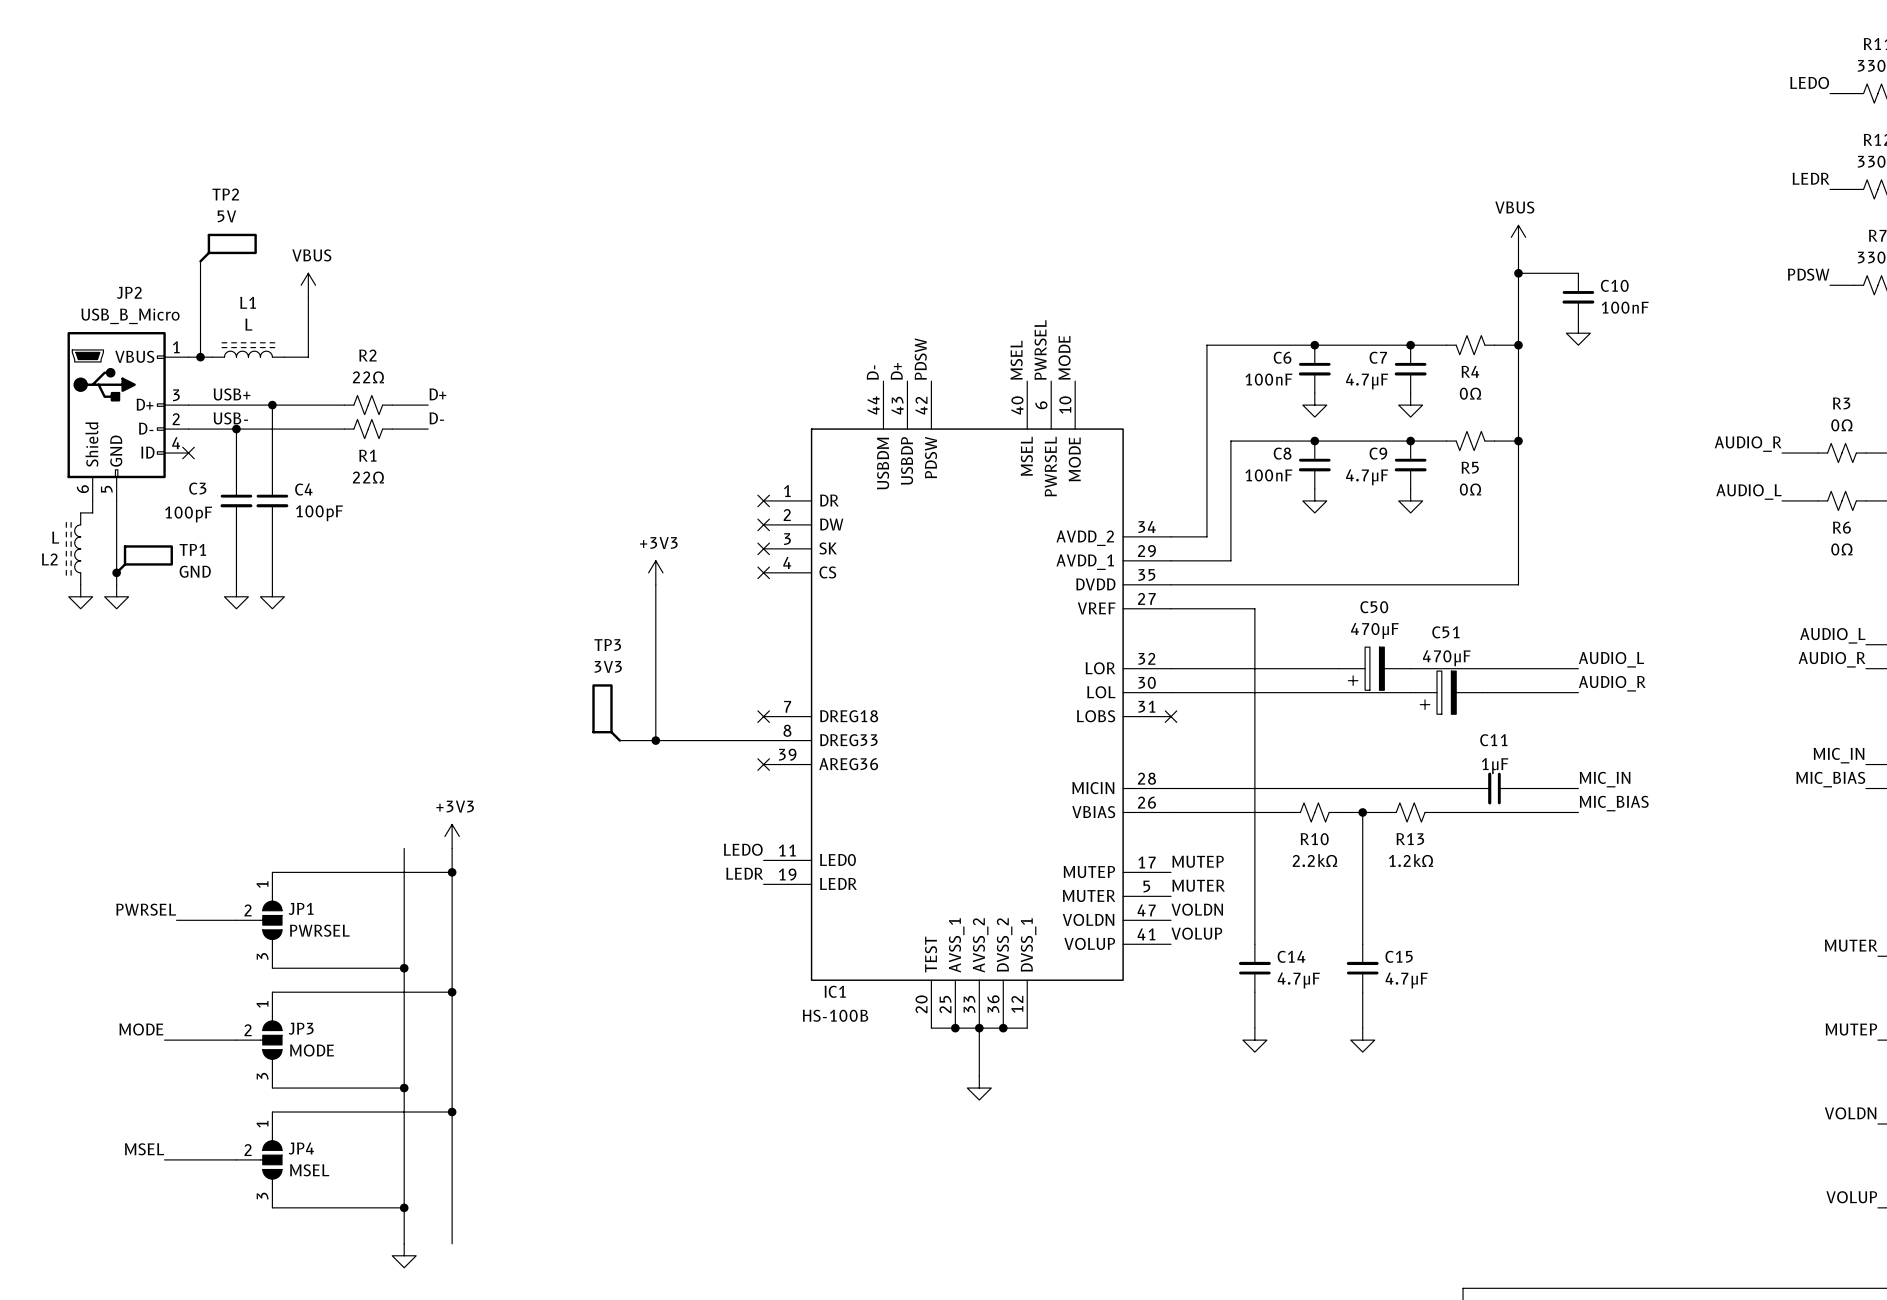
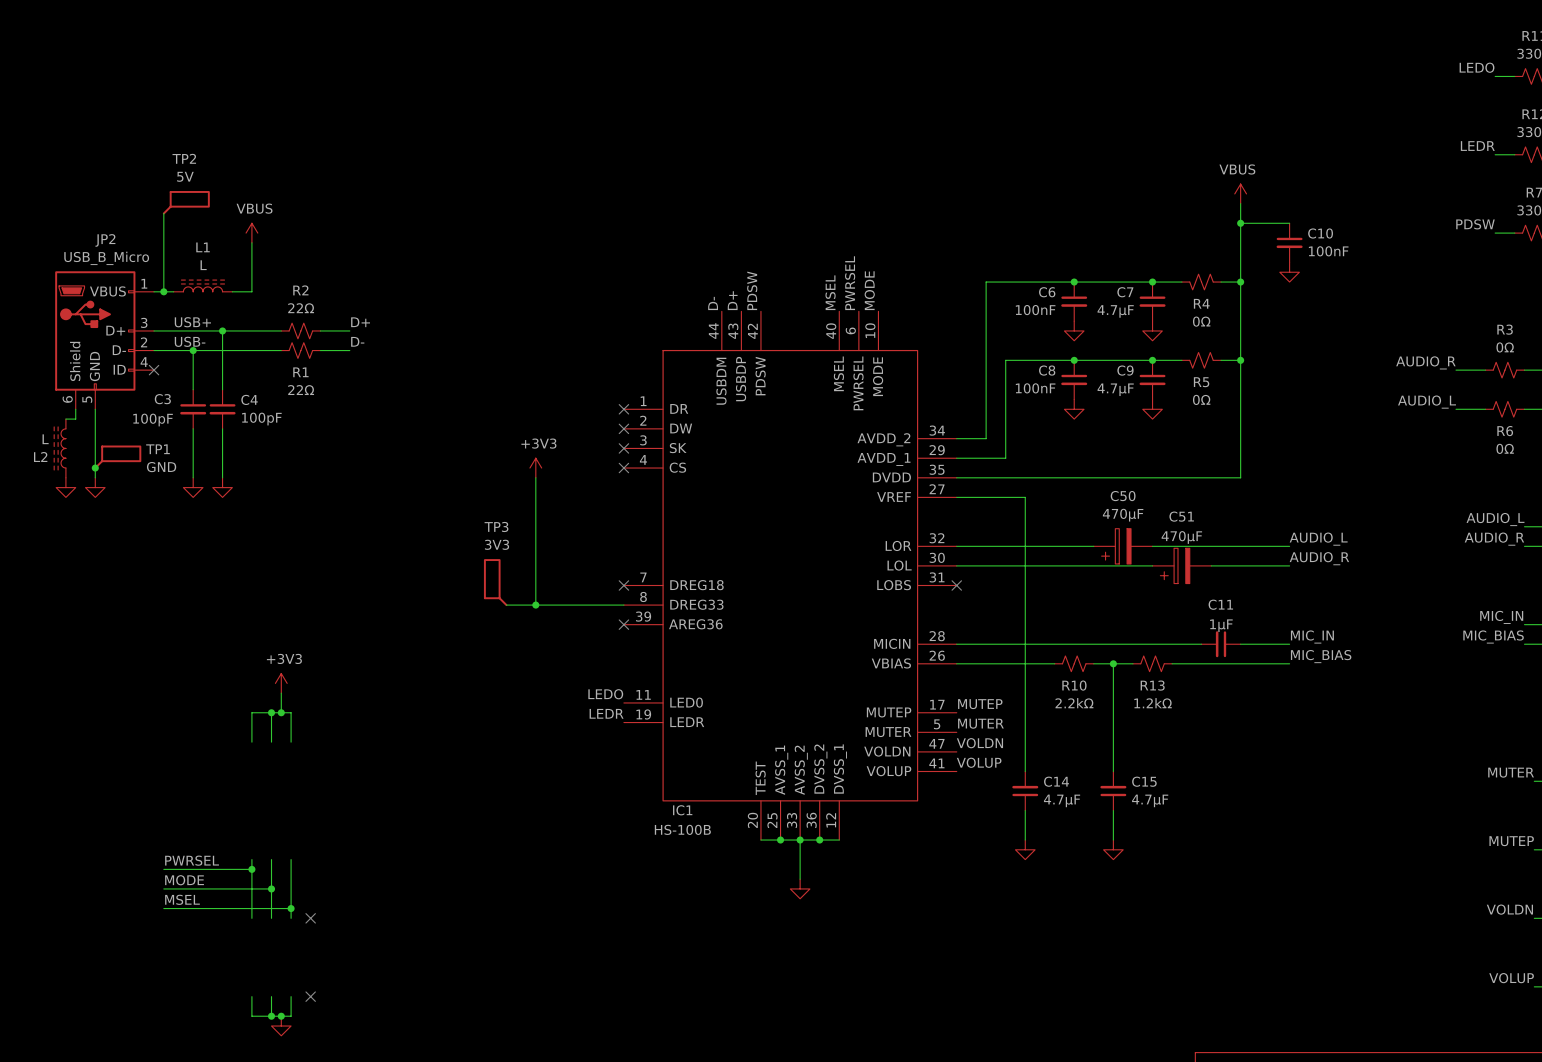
power symbol position: +3V3 (452, 836) -> +3V3 (281, 683)
wire: none -> (281, 693) (281, 712)
wire: (404, 848) (404, 1243) -> none
wire: (452, 848) (452, 1243) -> none
wire: (272, 872) (308, 872) -> (251, 742) (251, 712)
wire: none -> (271, 712) (271, 742)
junction: none -> (271, 712)
junction: none -> (281, 712)
wire: (356, 872) (452, 872) -> (291, 712) (291, 742)
junction: (452, 872) -> none
label position: PWRSEL (146, 909) -> PWRSEL (192, 860)
wire: (176, 920) (236, 920) -> none
JP1: PWRSEL (259, 920) -> none
wire: (272, 968) (404, 968) -> none
junction: (404, 968) -> none
wire: (272, 992) (452, 992) -> none
junction: (452, 992) -> none
label position: MODE (141, 1029) -> MODE (184, 880)
wire: (164, 1040) (236, 1040) -> (163, 888) (222, 888)
JP3: MODE (259, 1040) -> none
wire: none -> (251, 859) (251, 918)
wire: none -> (271, 859) (271, 918)
wire: none -> (291, 859) (291, 918)
wire: none -> (163, 869) (251, 869)
junction: none -> (251, 869)
wire: (332, 1088) (404, 1088) -> none
junction: none -> (271, 888)
junction: (404, 1088) -> none
wire: (356, 1112) (452, 1112) -> none
junction: none -> (291, 908)
junction: (452, 1112) -> none
no-connect mark: none -> (310, 918)
label position: MSEL (144, 1149) -> MSEL (182, 899)
wire: (164, 1159) (236, 1159) -> (163, 908) (222, 908)
JP4: MSEL (259, 1159) -> none
wire: (272, 1207) (404, 1207) -> none
junction: (404, 1207) -> none
wire: none -> (251, 996) (251, 1016) (291, 1016) (291, 996)
wire: none -> (271, 996) (271, 1016)
no-connect mark: none -> (310, 996)
junction: none -> (271, 1016)
junction: none -> (281, 1016)
power symbol position: (404, 1255) -> (281, 1026)

